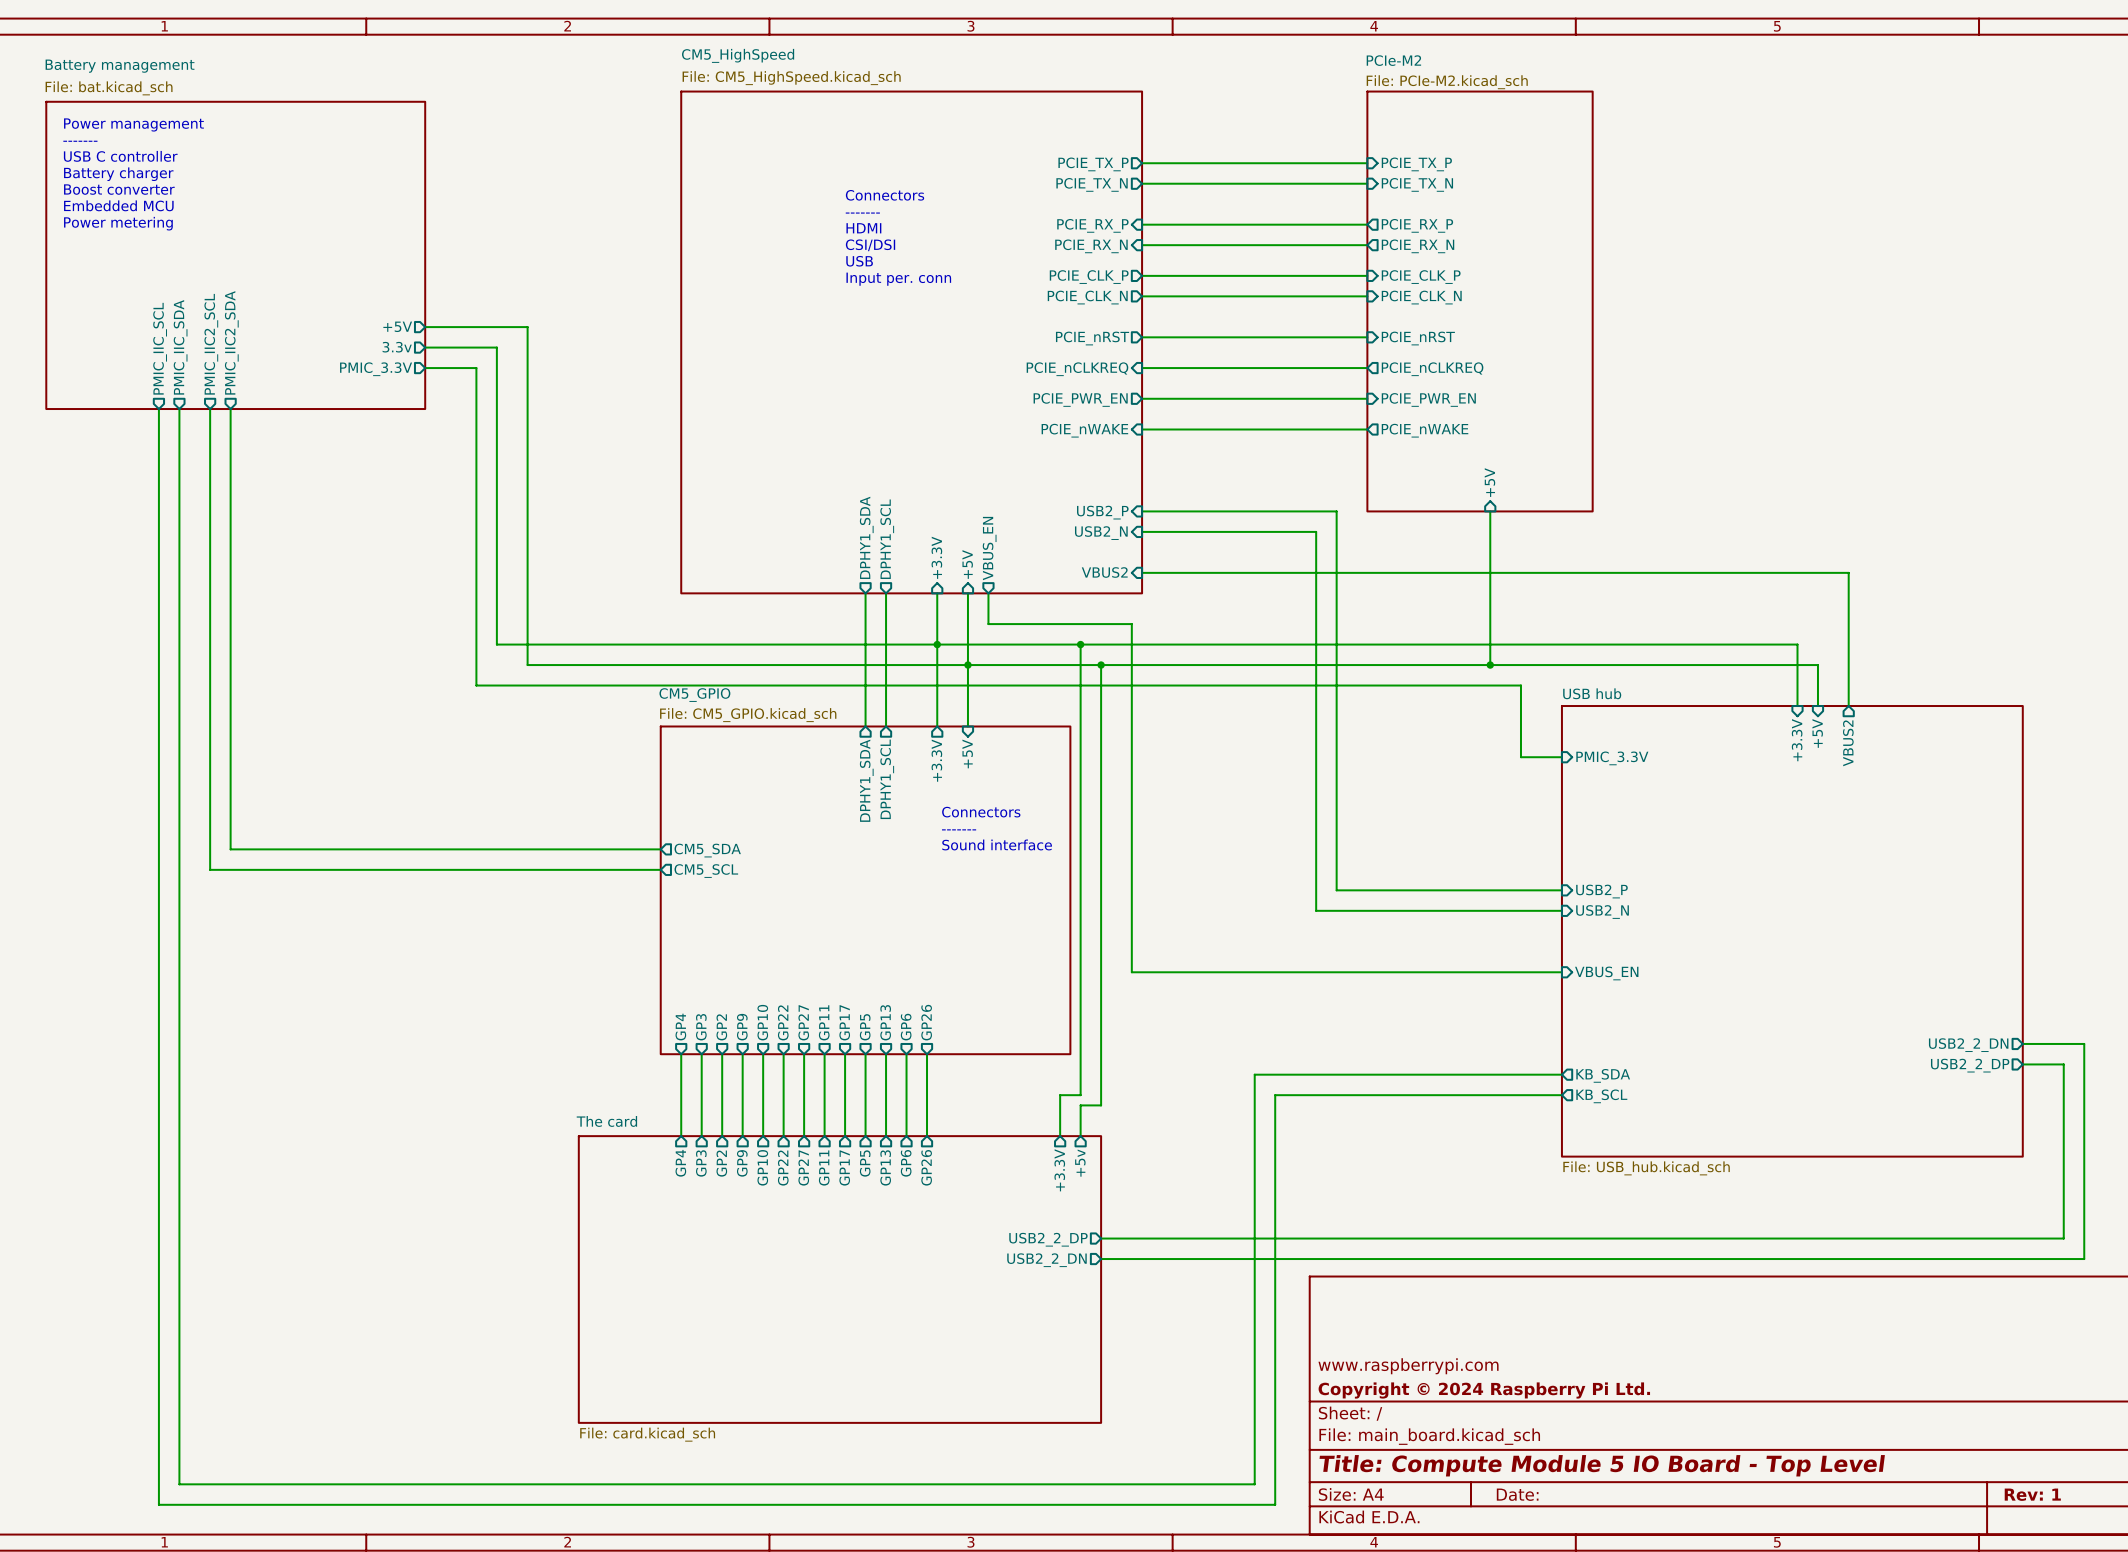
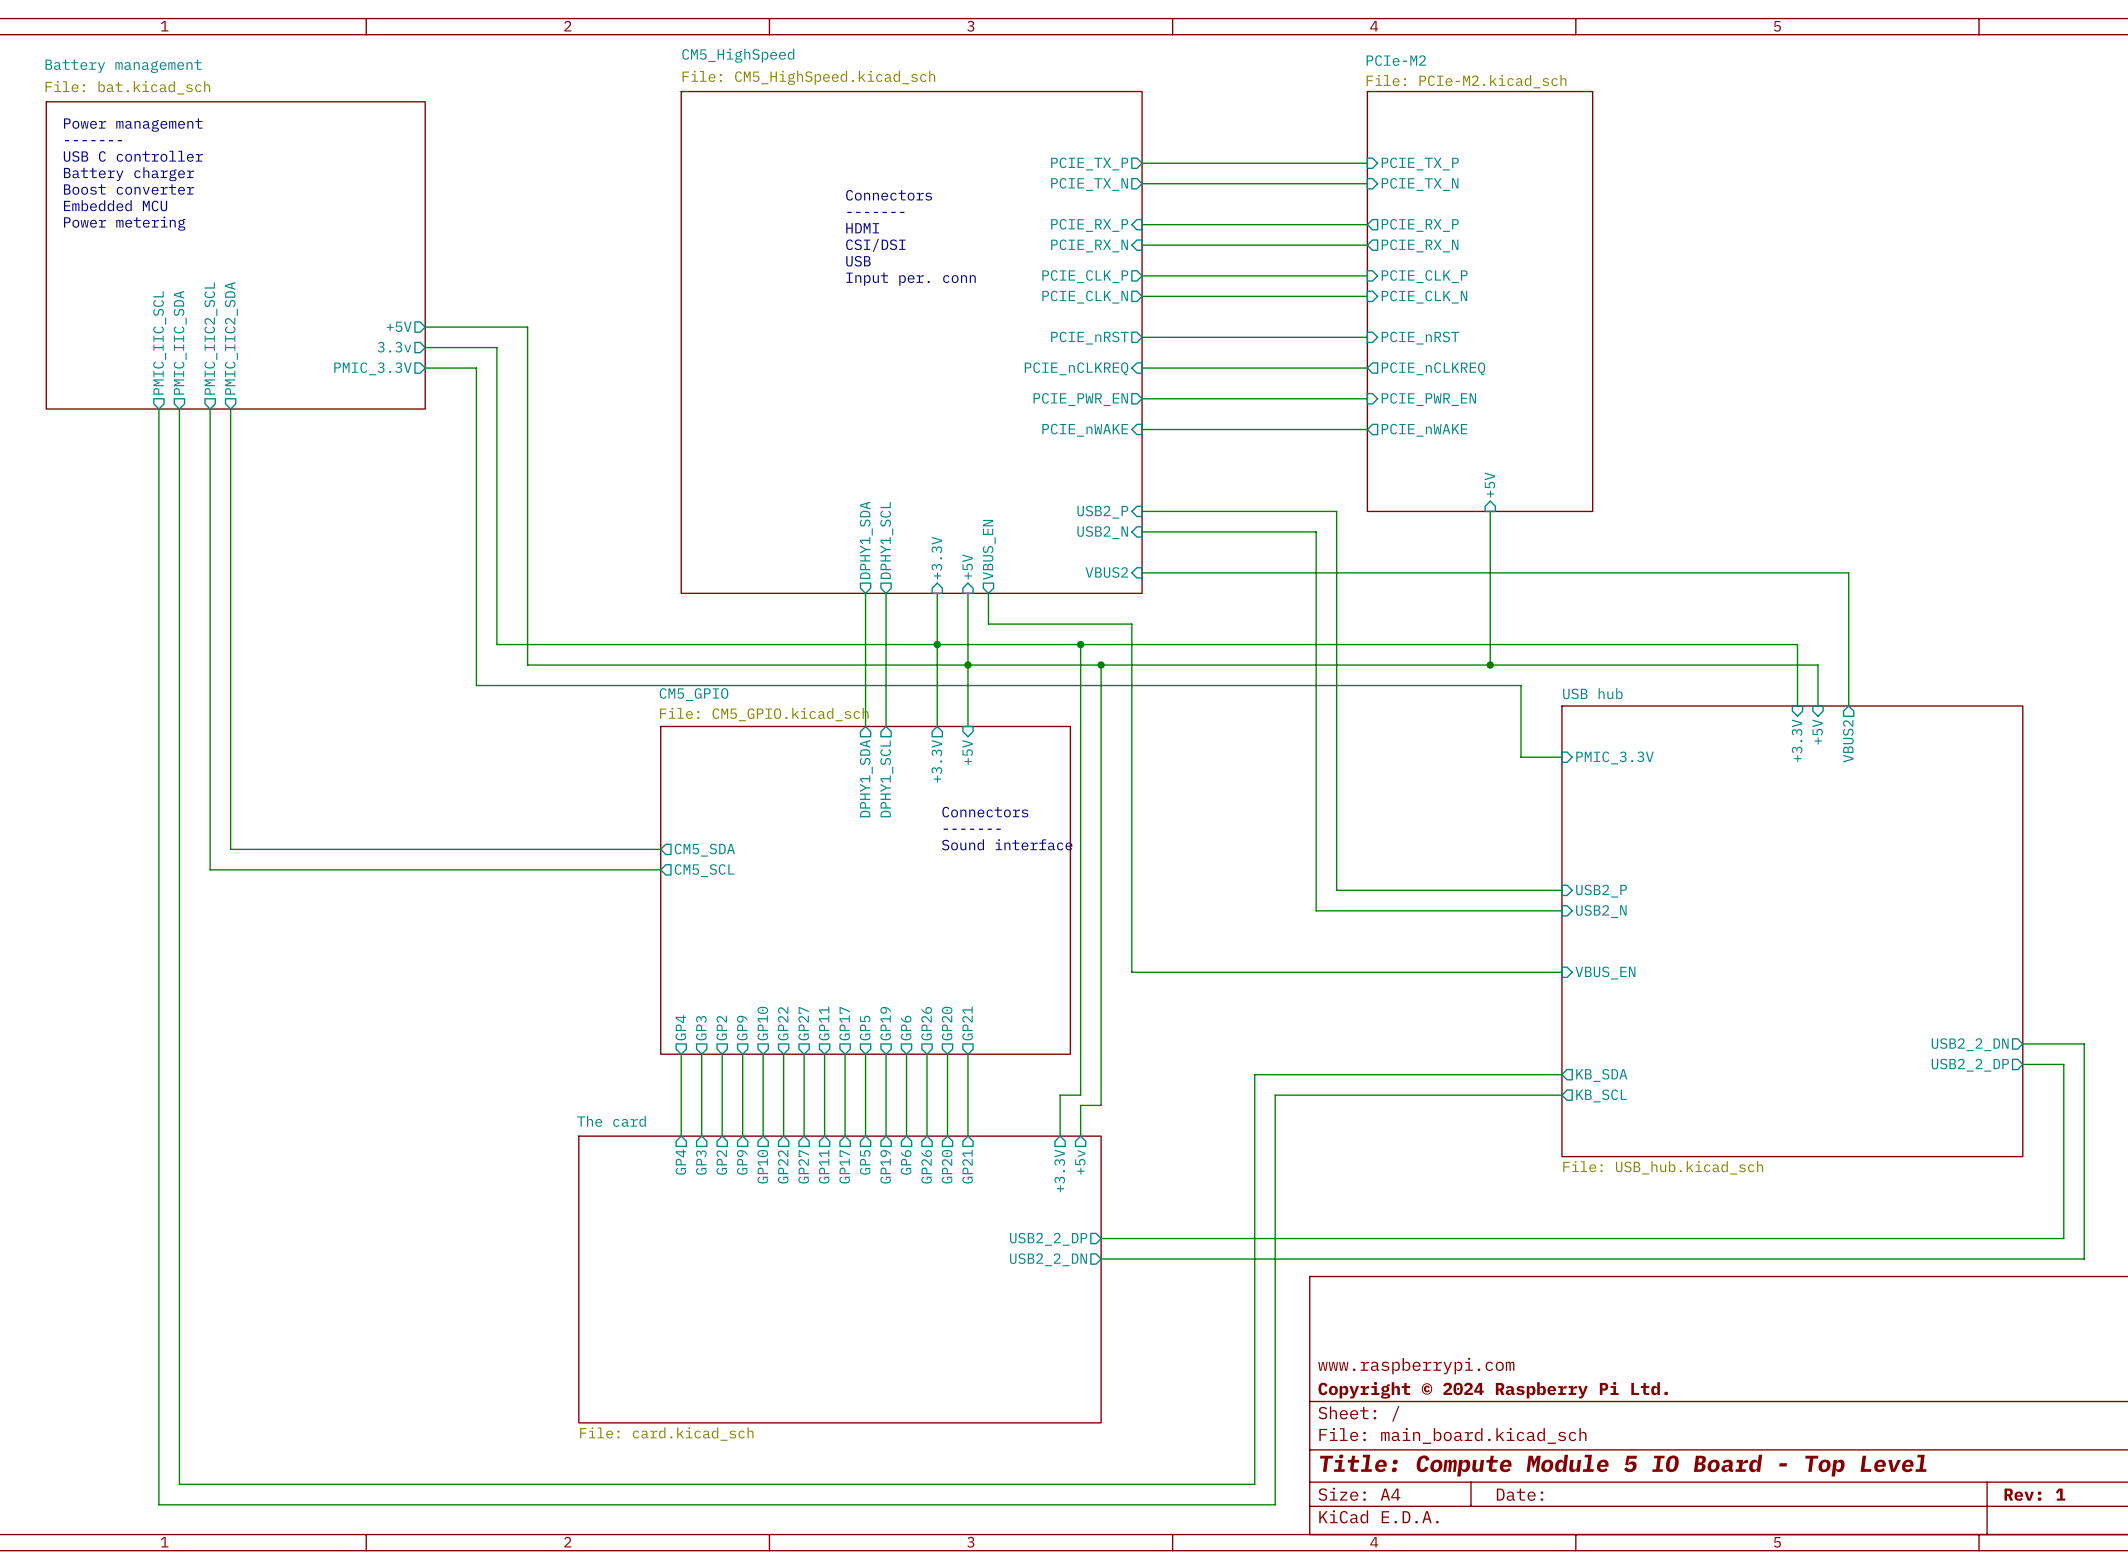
sheet pin: GP13 (885, 1022) -> GP19 (885, 1023)
sheet pin: none -> GP20 (947, 1023)
sheet pin: none -> GP21 (967, 1023)
wire: none -> (947, 1054) (947, 1136)
wire: none -> (967, 1054) (967, 1136)
sheet pin: GP13 (885, 1167) -> GP19 (885, 1166)
sheet pin: none -> GP20 (947, 1166)
sheet pin: none -> GP21 (967, 1166)

